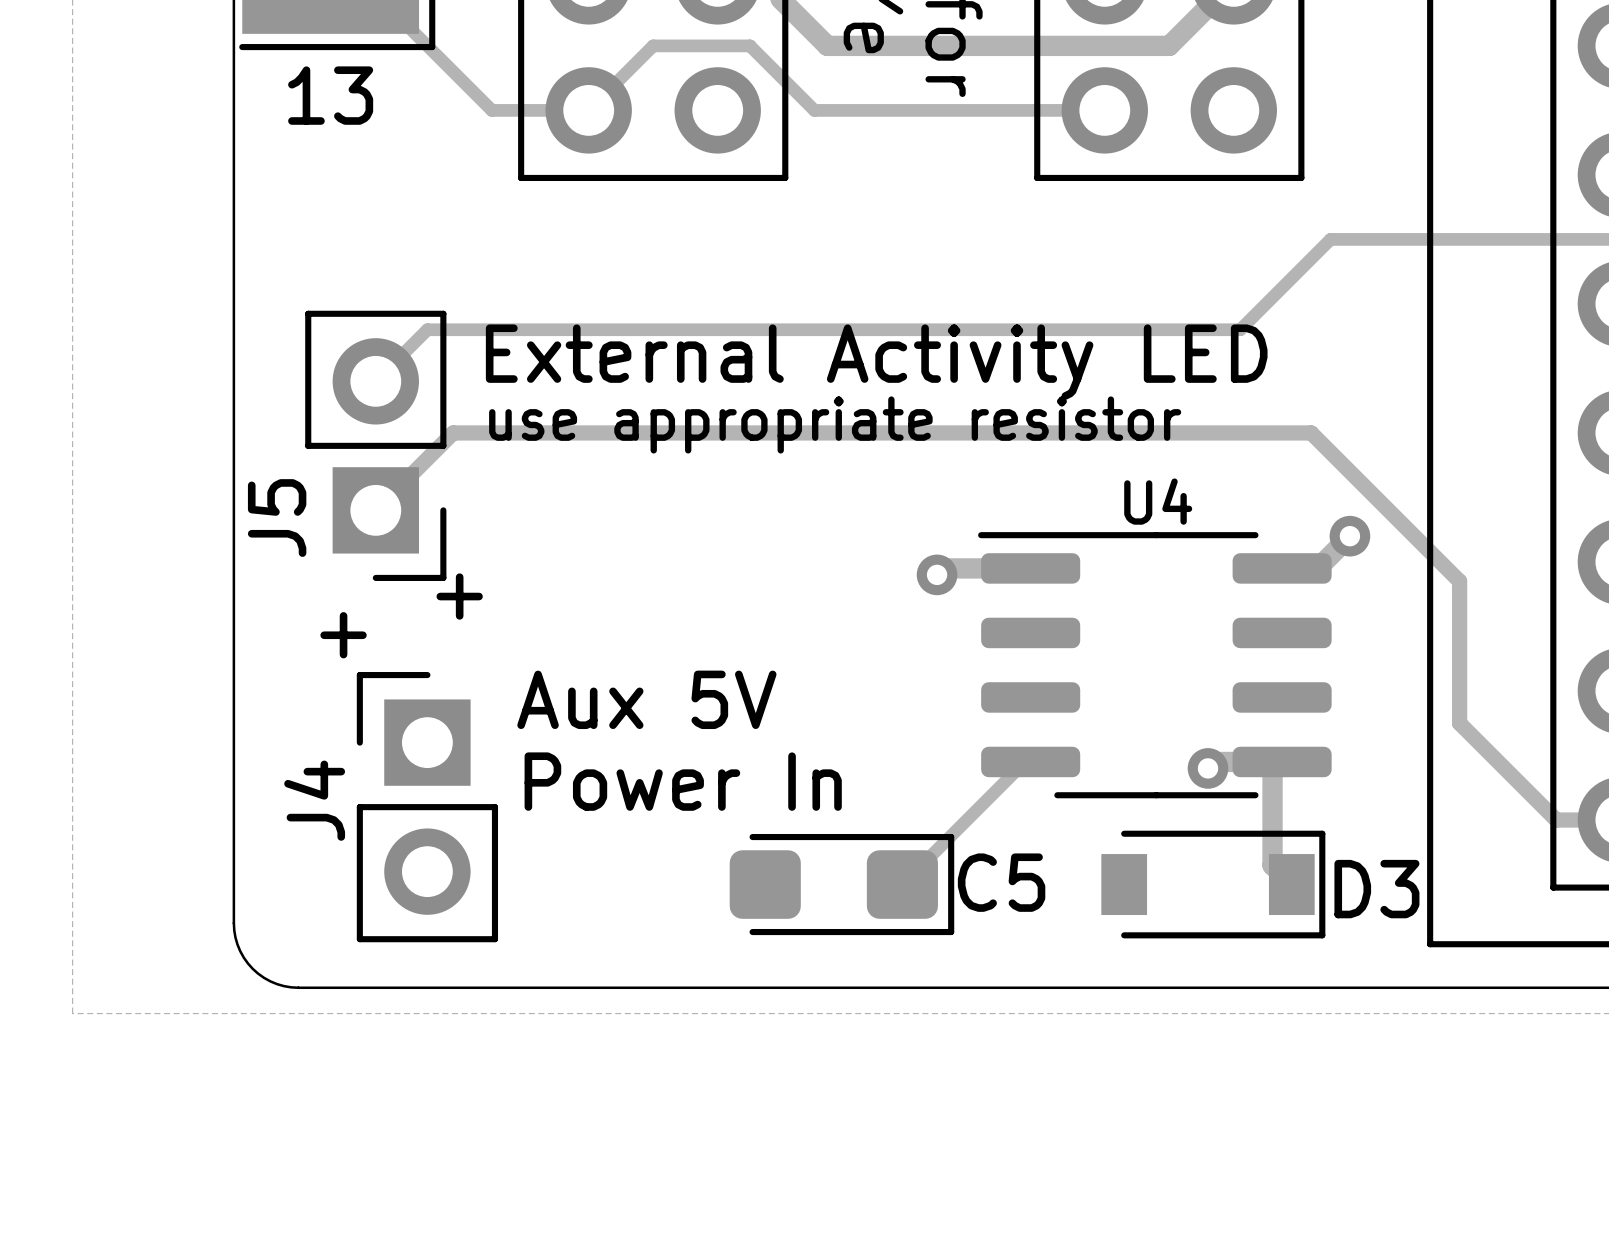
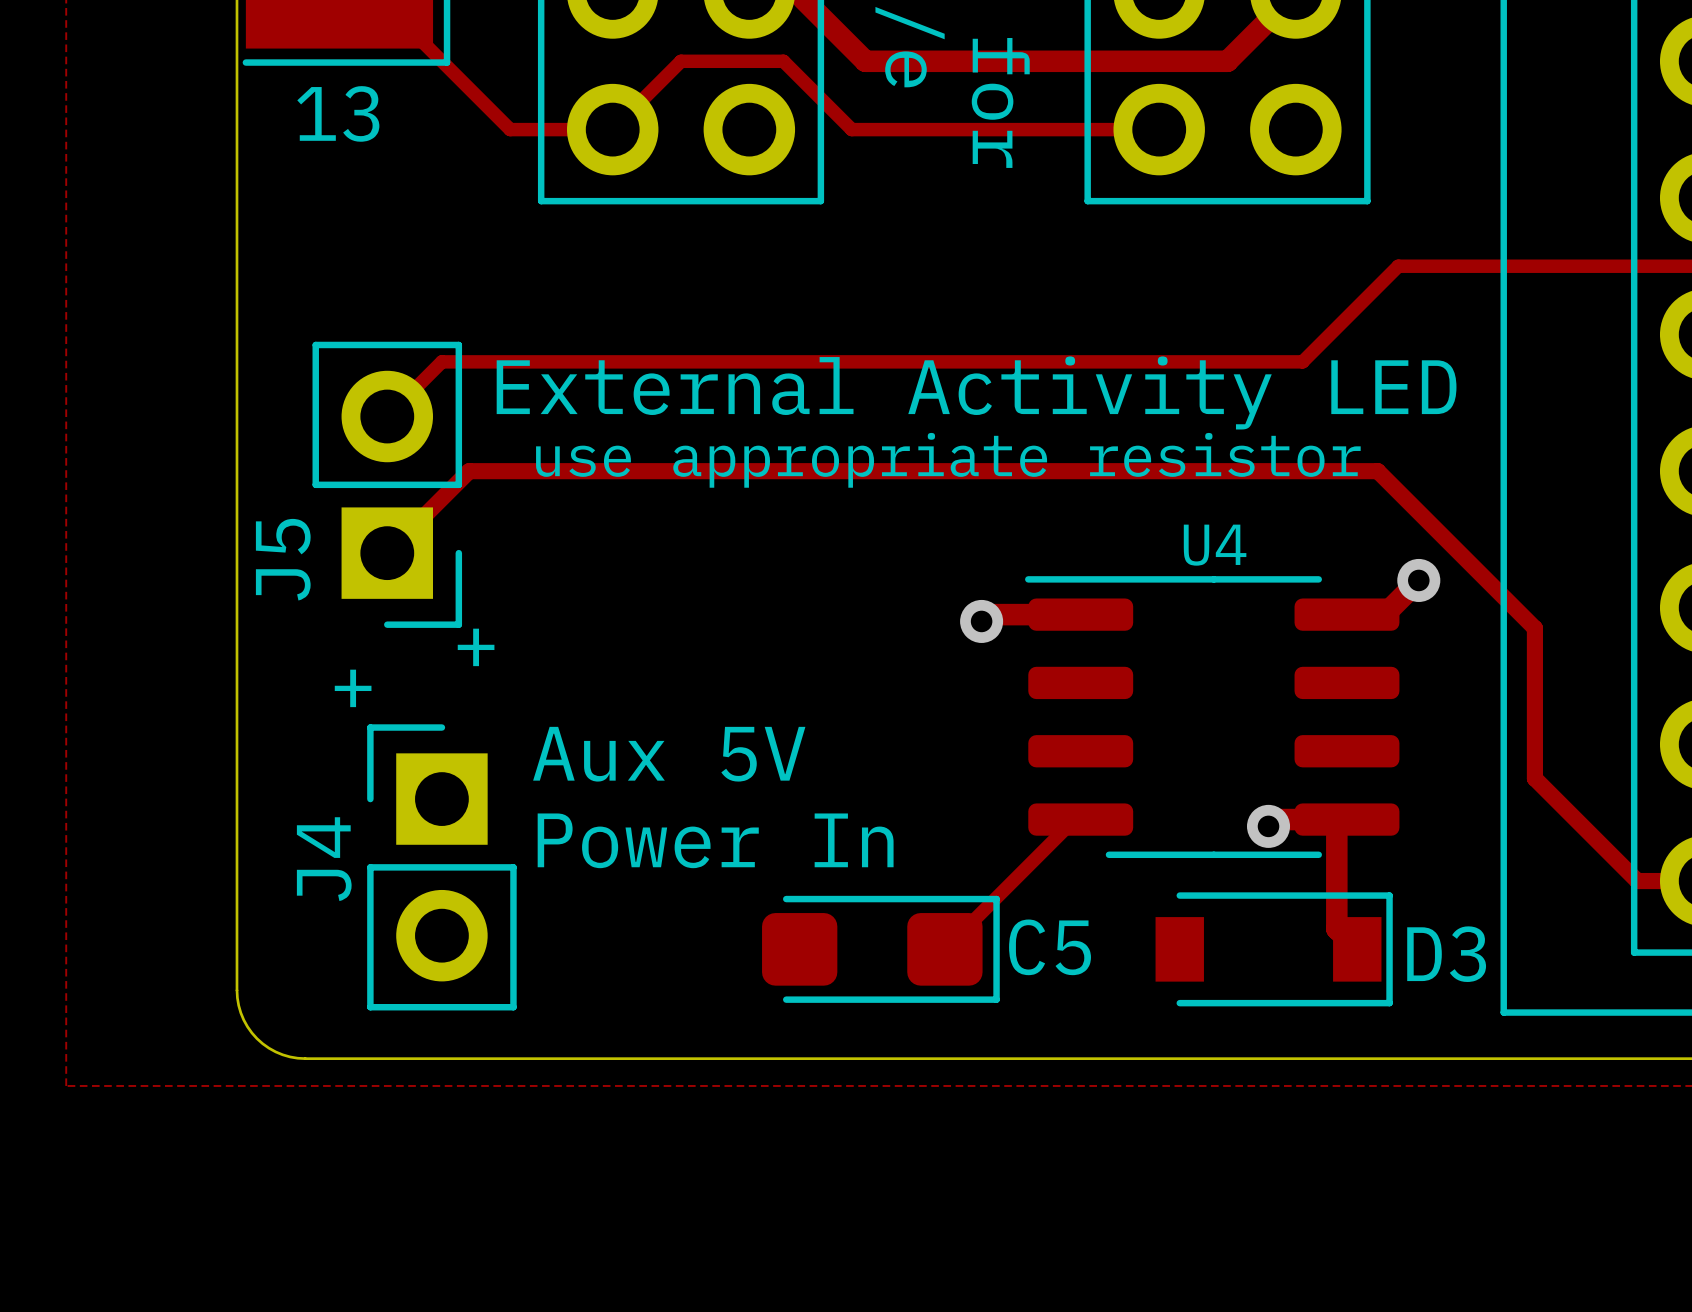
text position: use appropriate resistor (835, 424) -> use appropriate resistor (948, 460)

